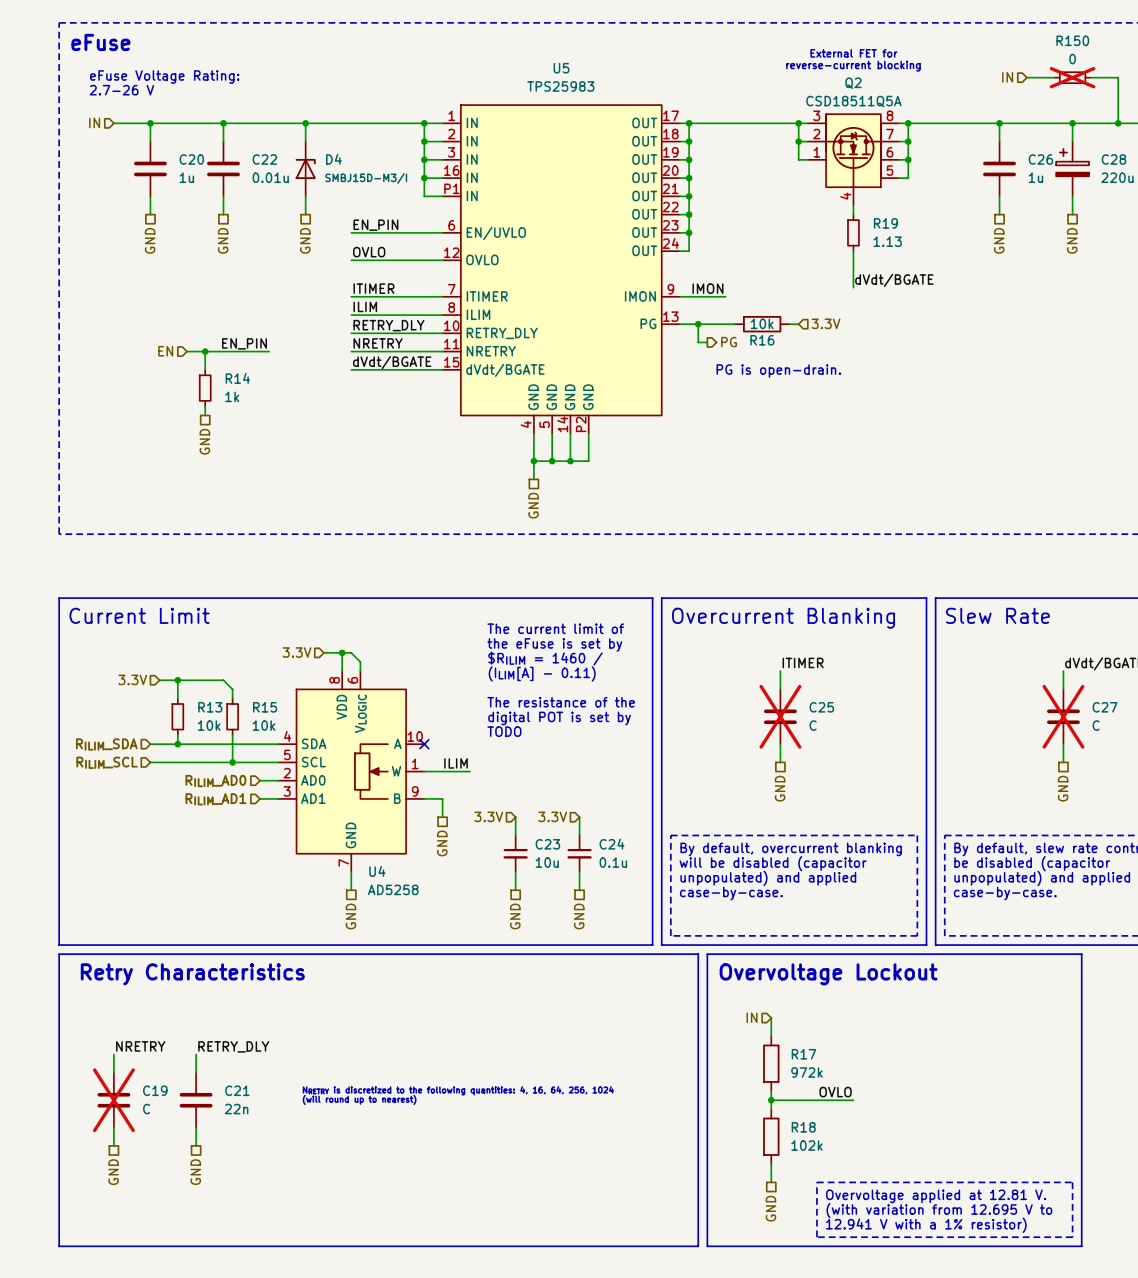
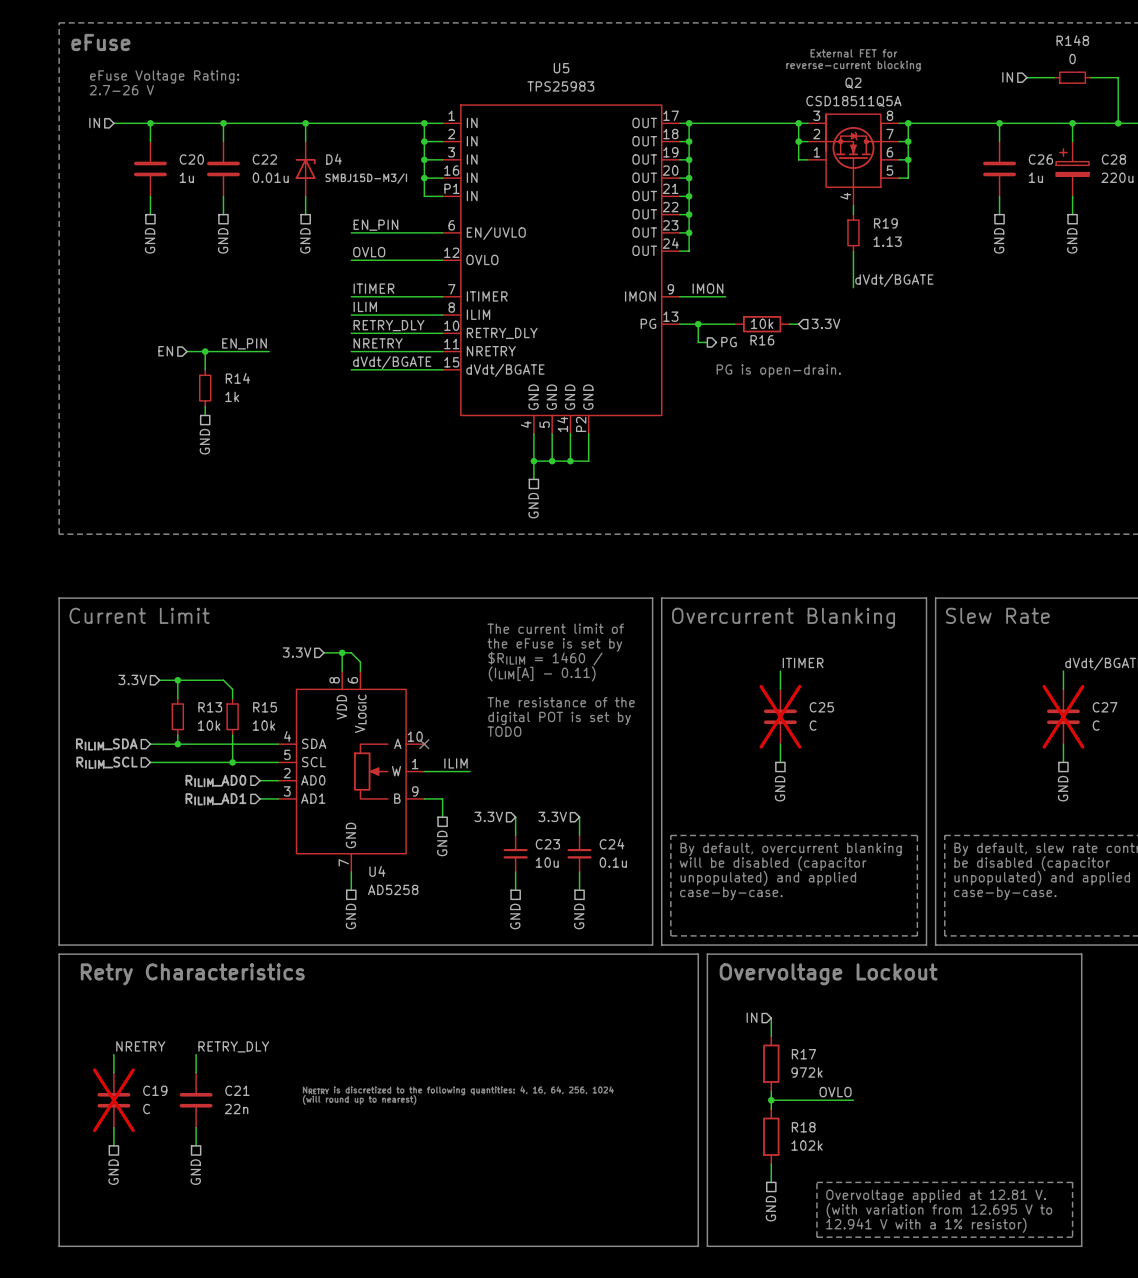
R150 name: R150 (1072, 40) -> R148 (1072, 40)
R150 do-not-place cross: (1072, 77) -> none

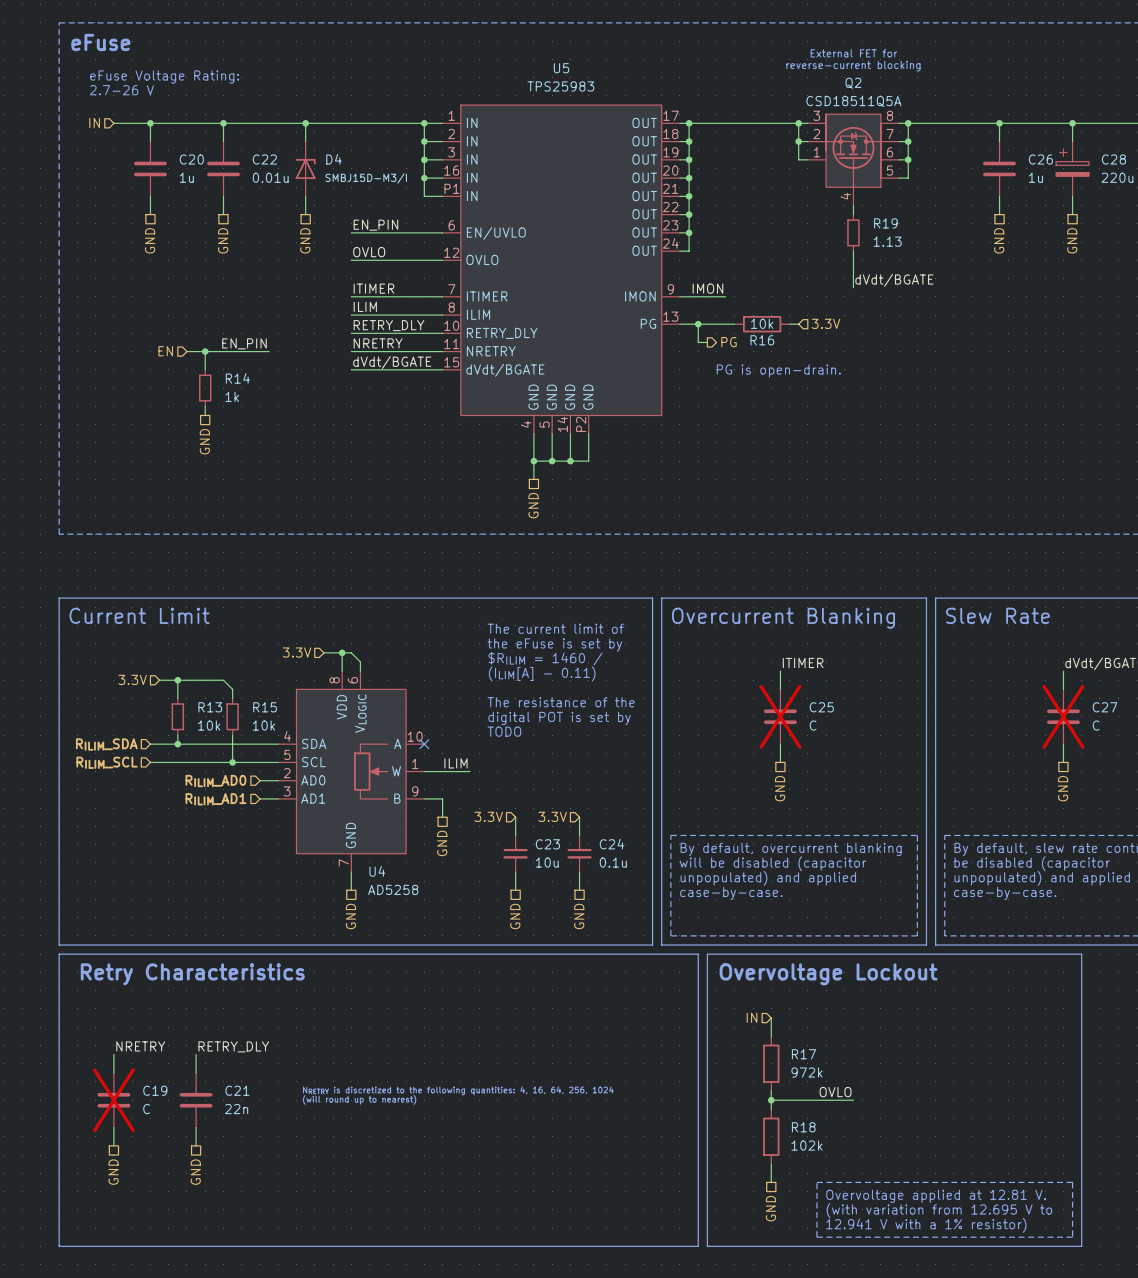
hierarchical label: IN (1007, 77) -> none
wire: (1026, 77) (1054, 77) -> none
R148: 0 (1072, 77) -> none
wire: (1090, 77) (1118, 77) (1118, 123) -> none
junction: (1118, 123) -> none

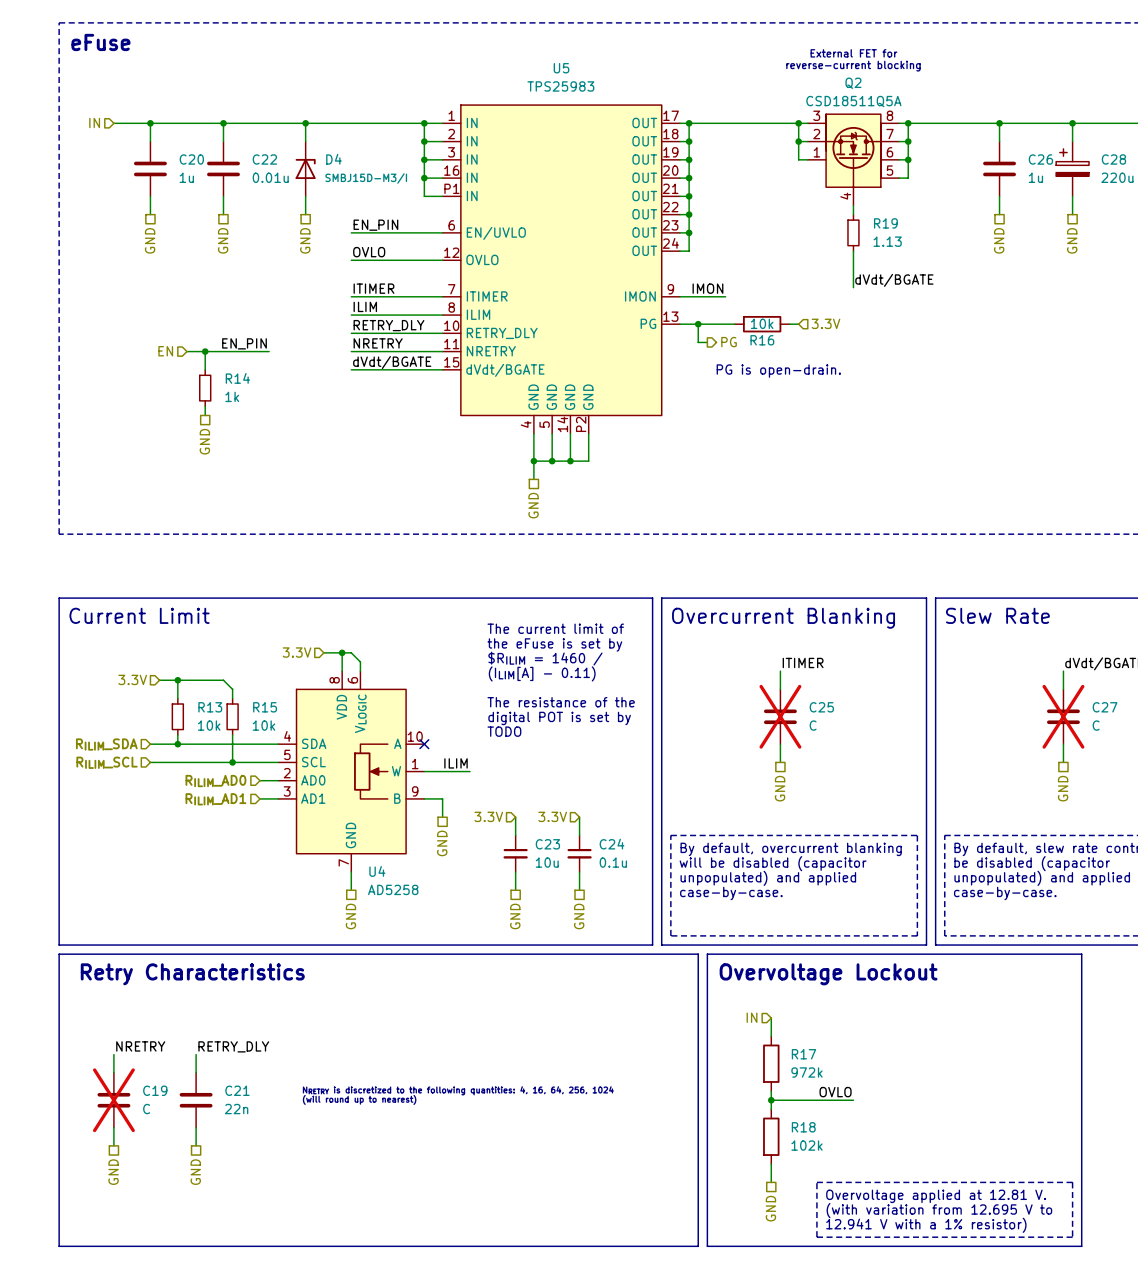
text: eFuse Voltage Rating: (164, 77) -> none
text: 2.7-26 V (121, 90) -> none

